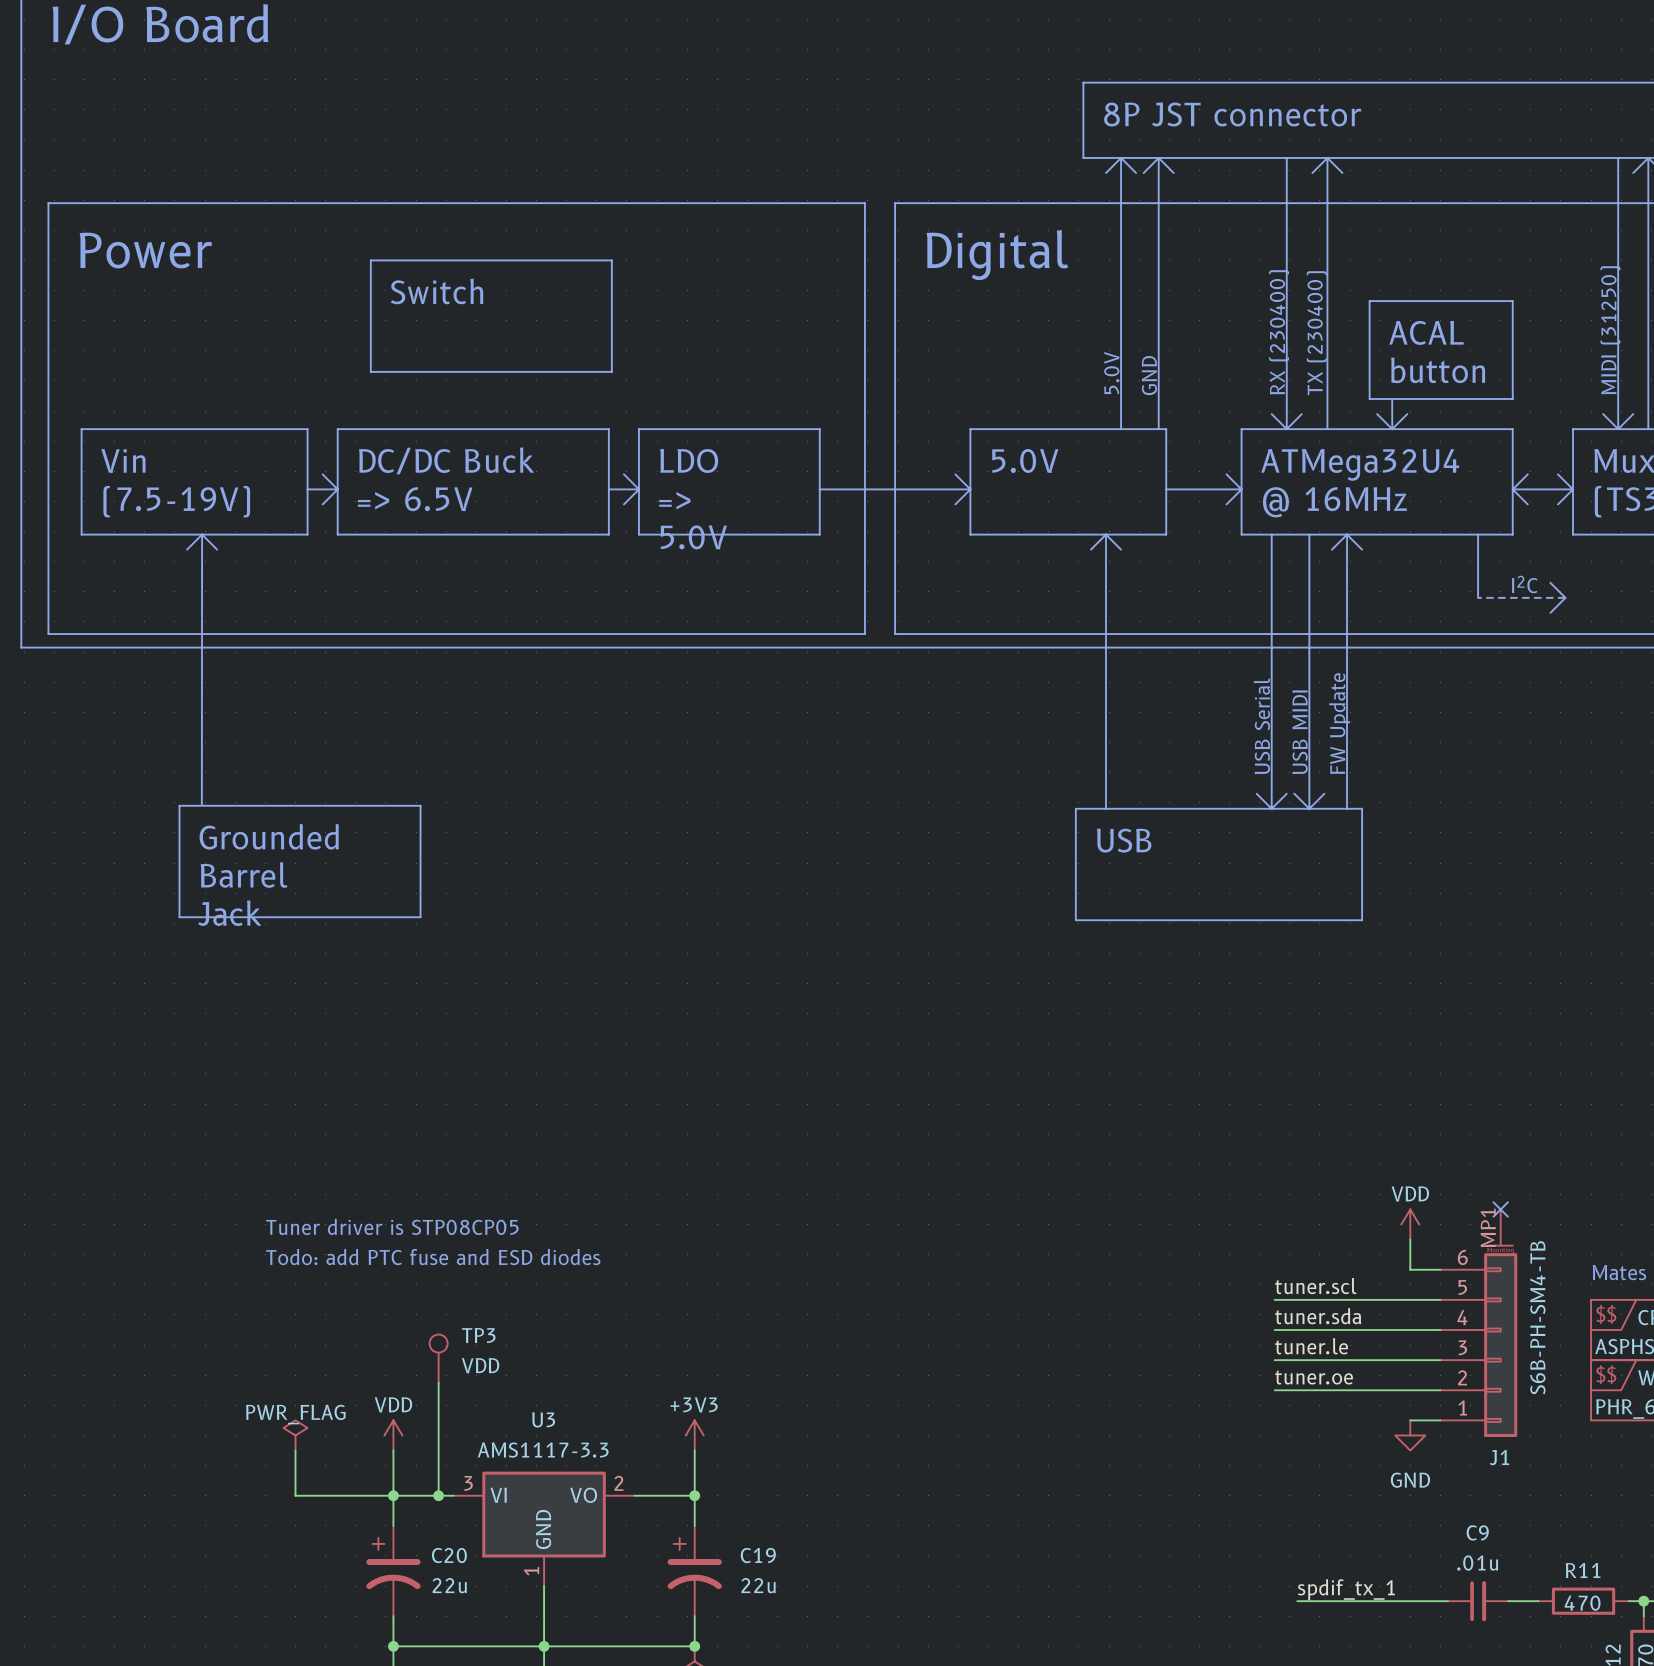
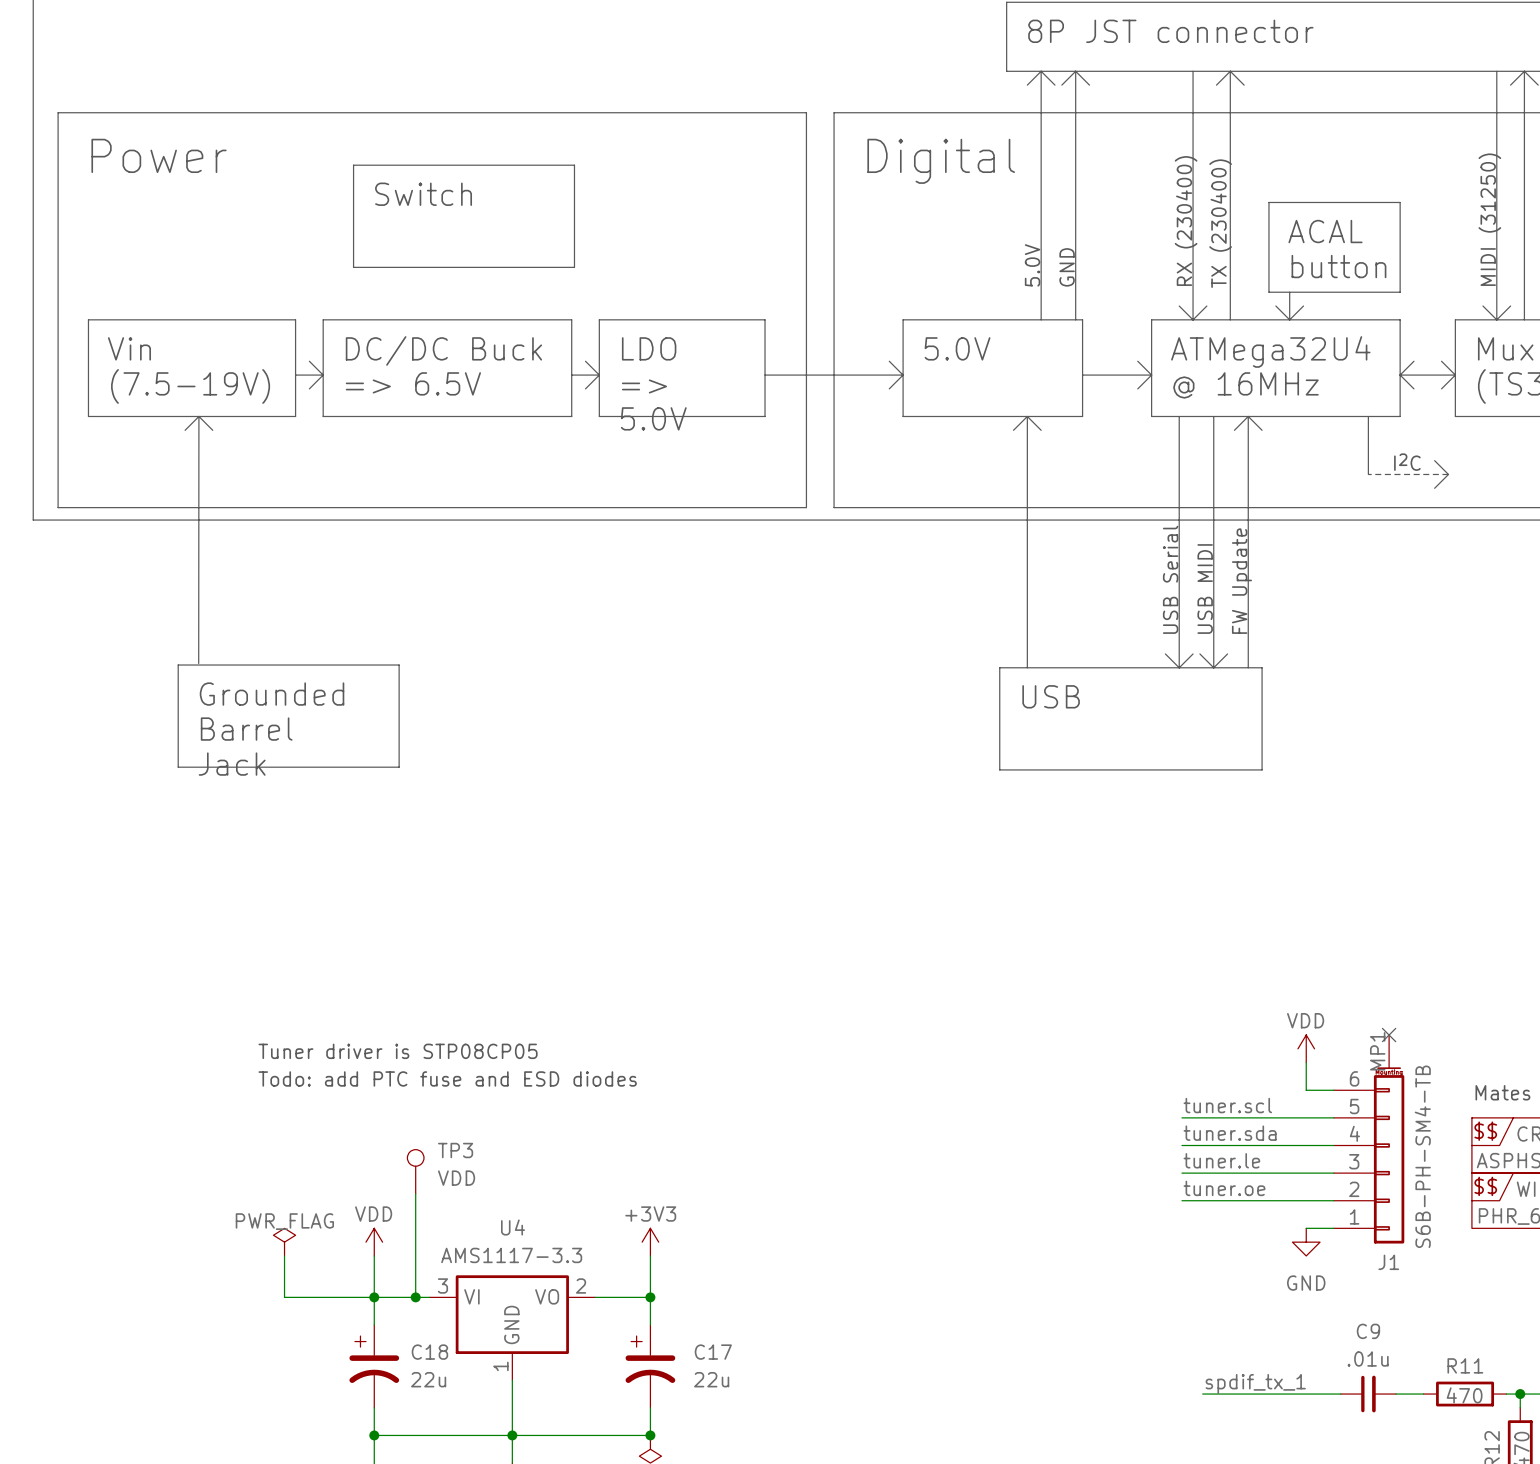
U3 name: U3 (543, 1419) -> U4 (513, 1227)
C20 name: C20 (449, 1555) -> C18 (429, 1352)
C19 name: C19 (758, 1555) -> C17 (713, 1352)

